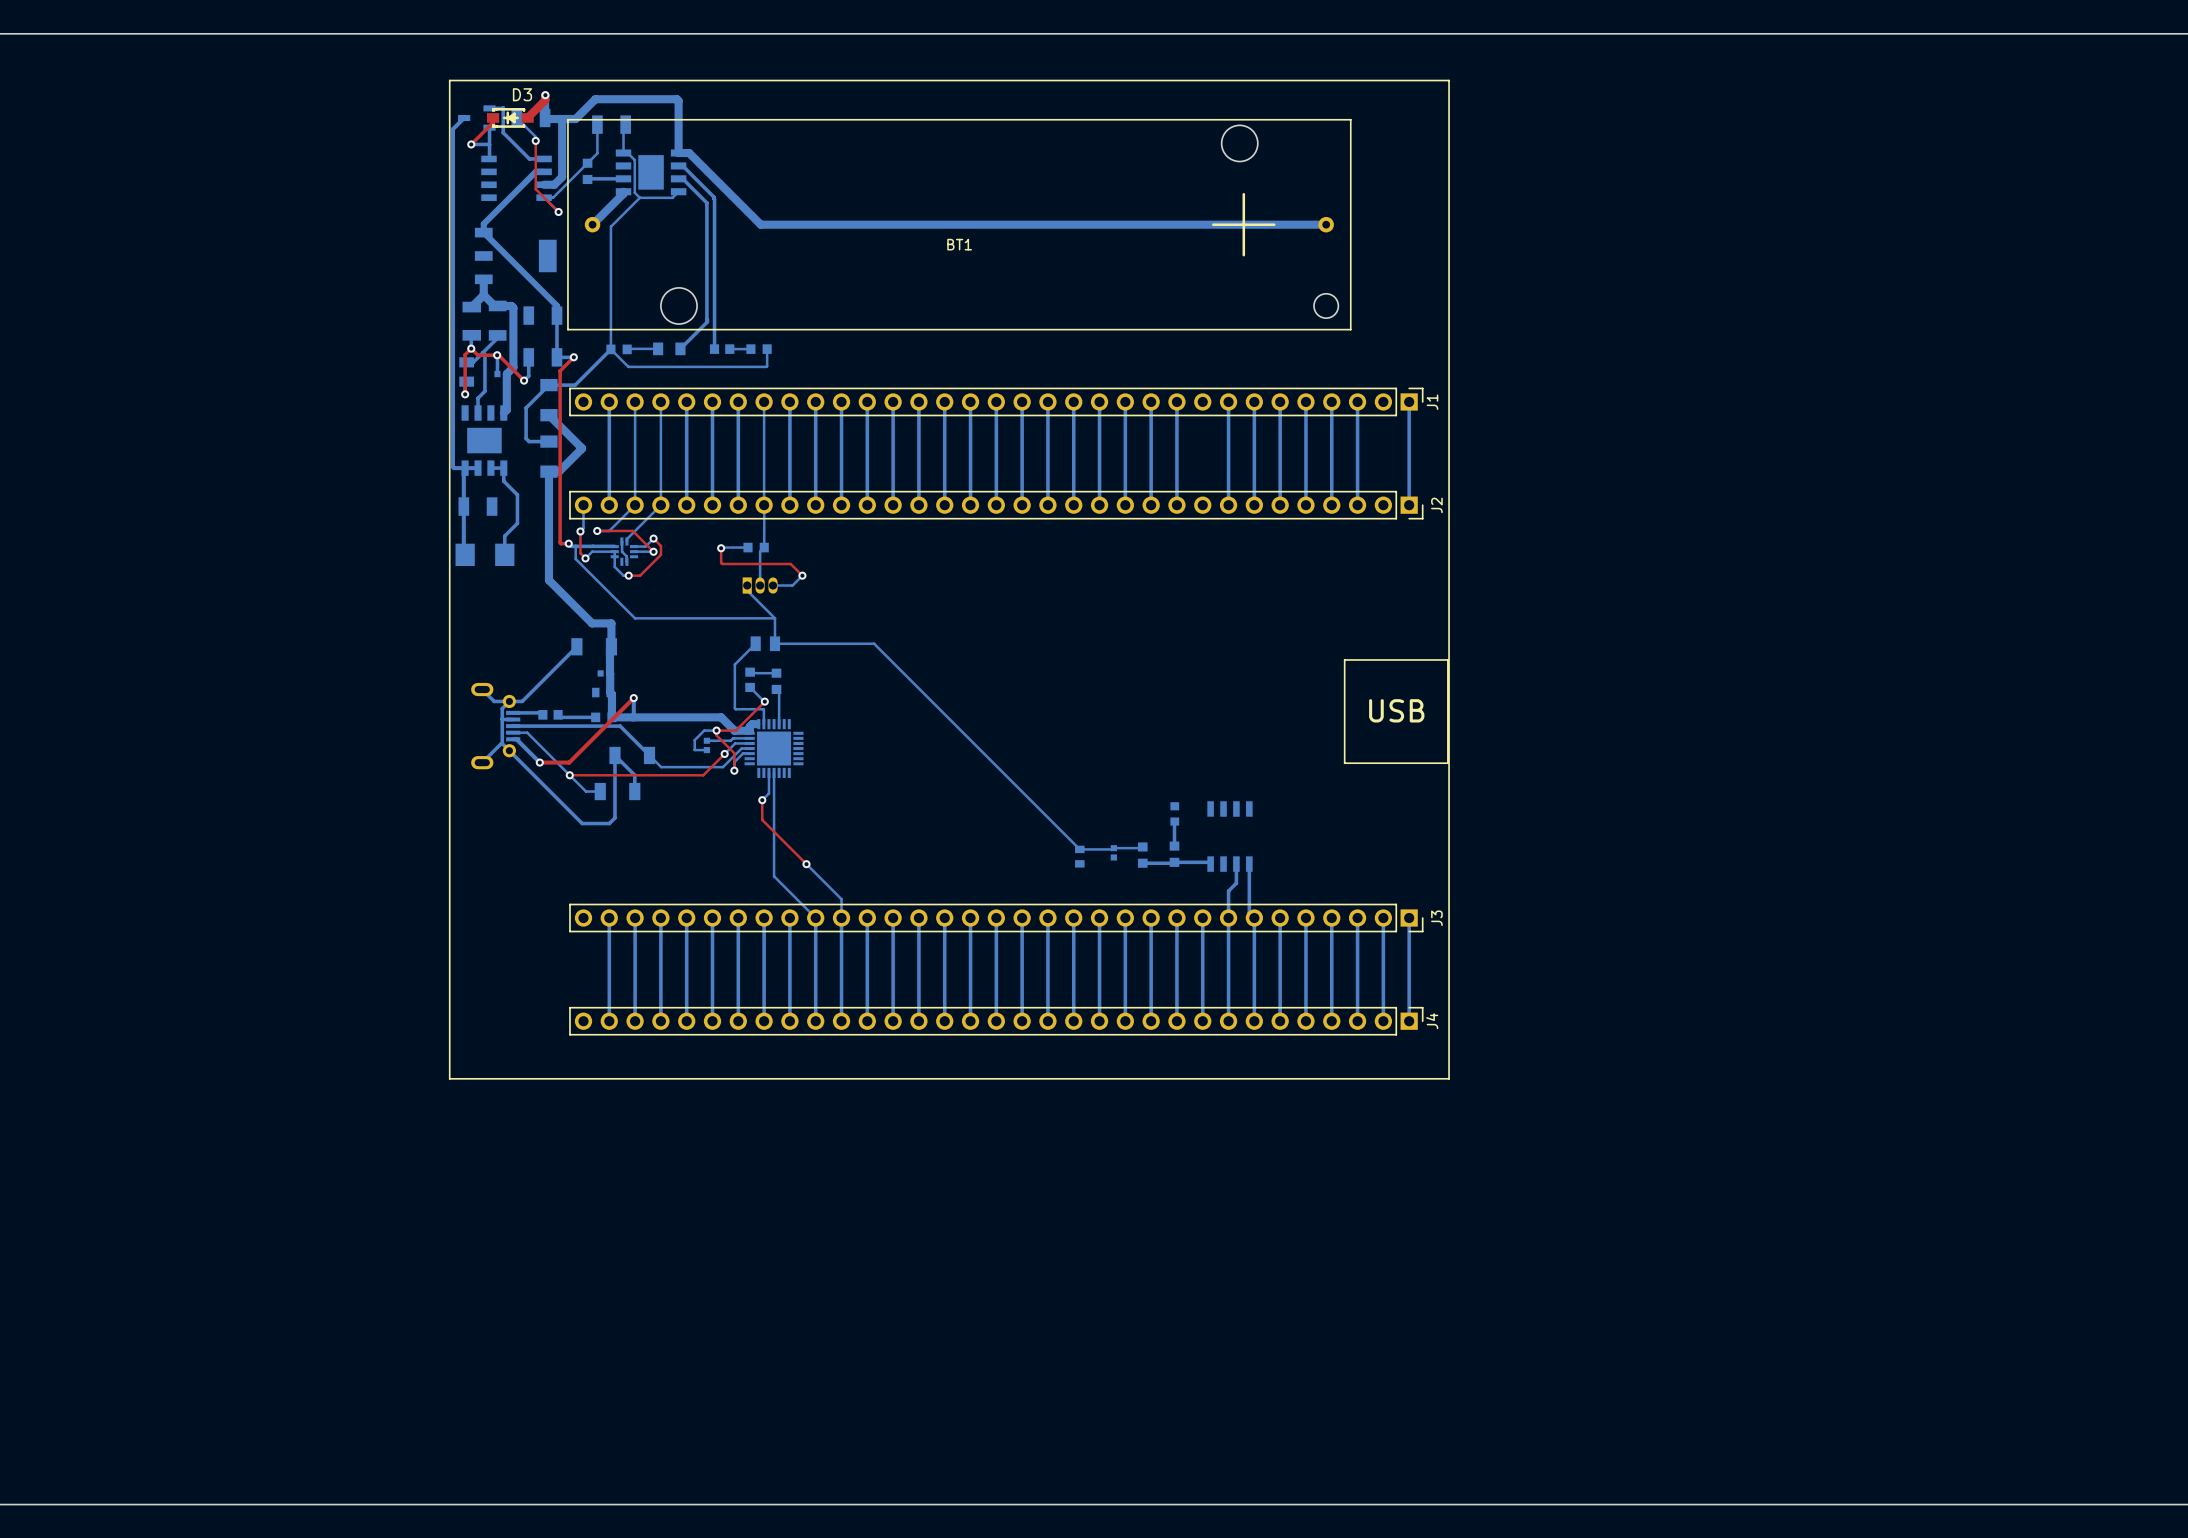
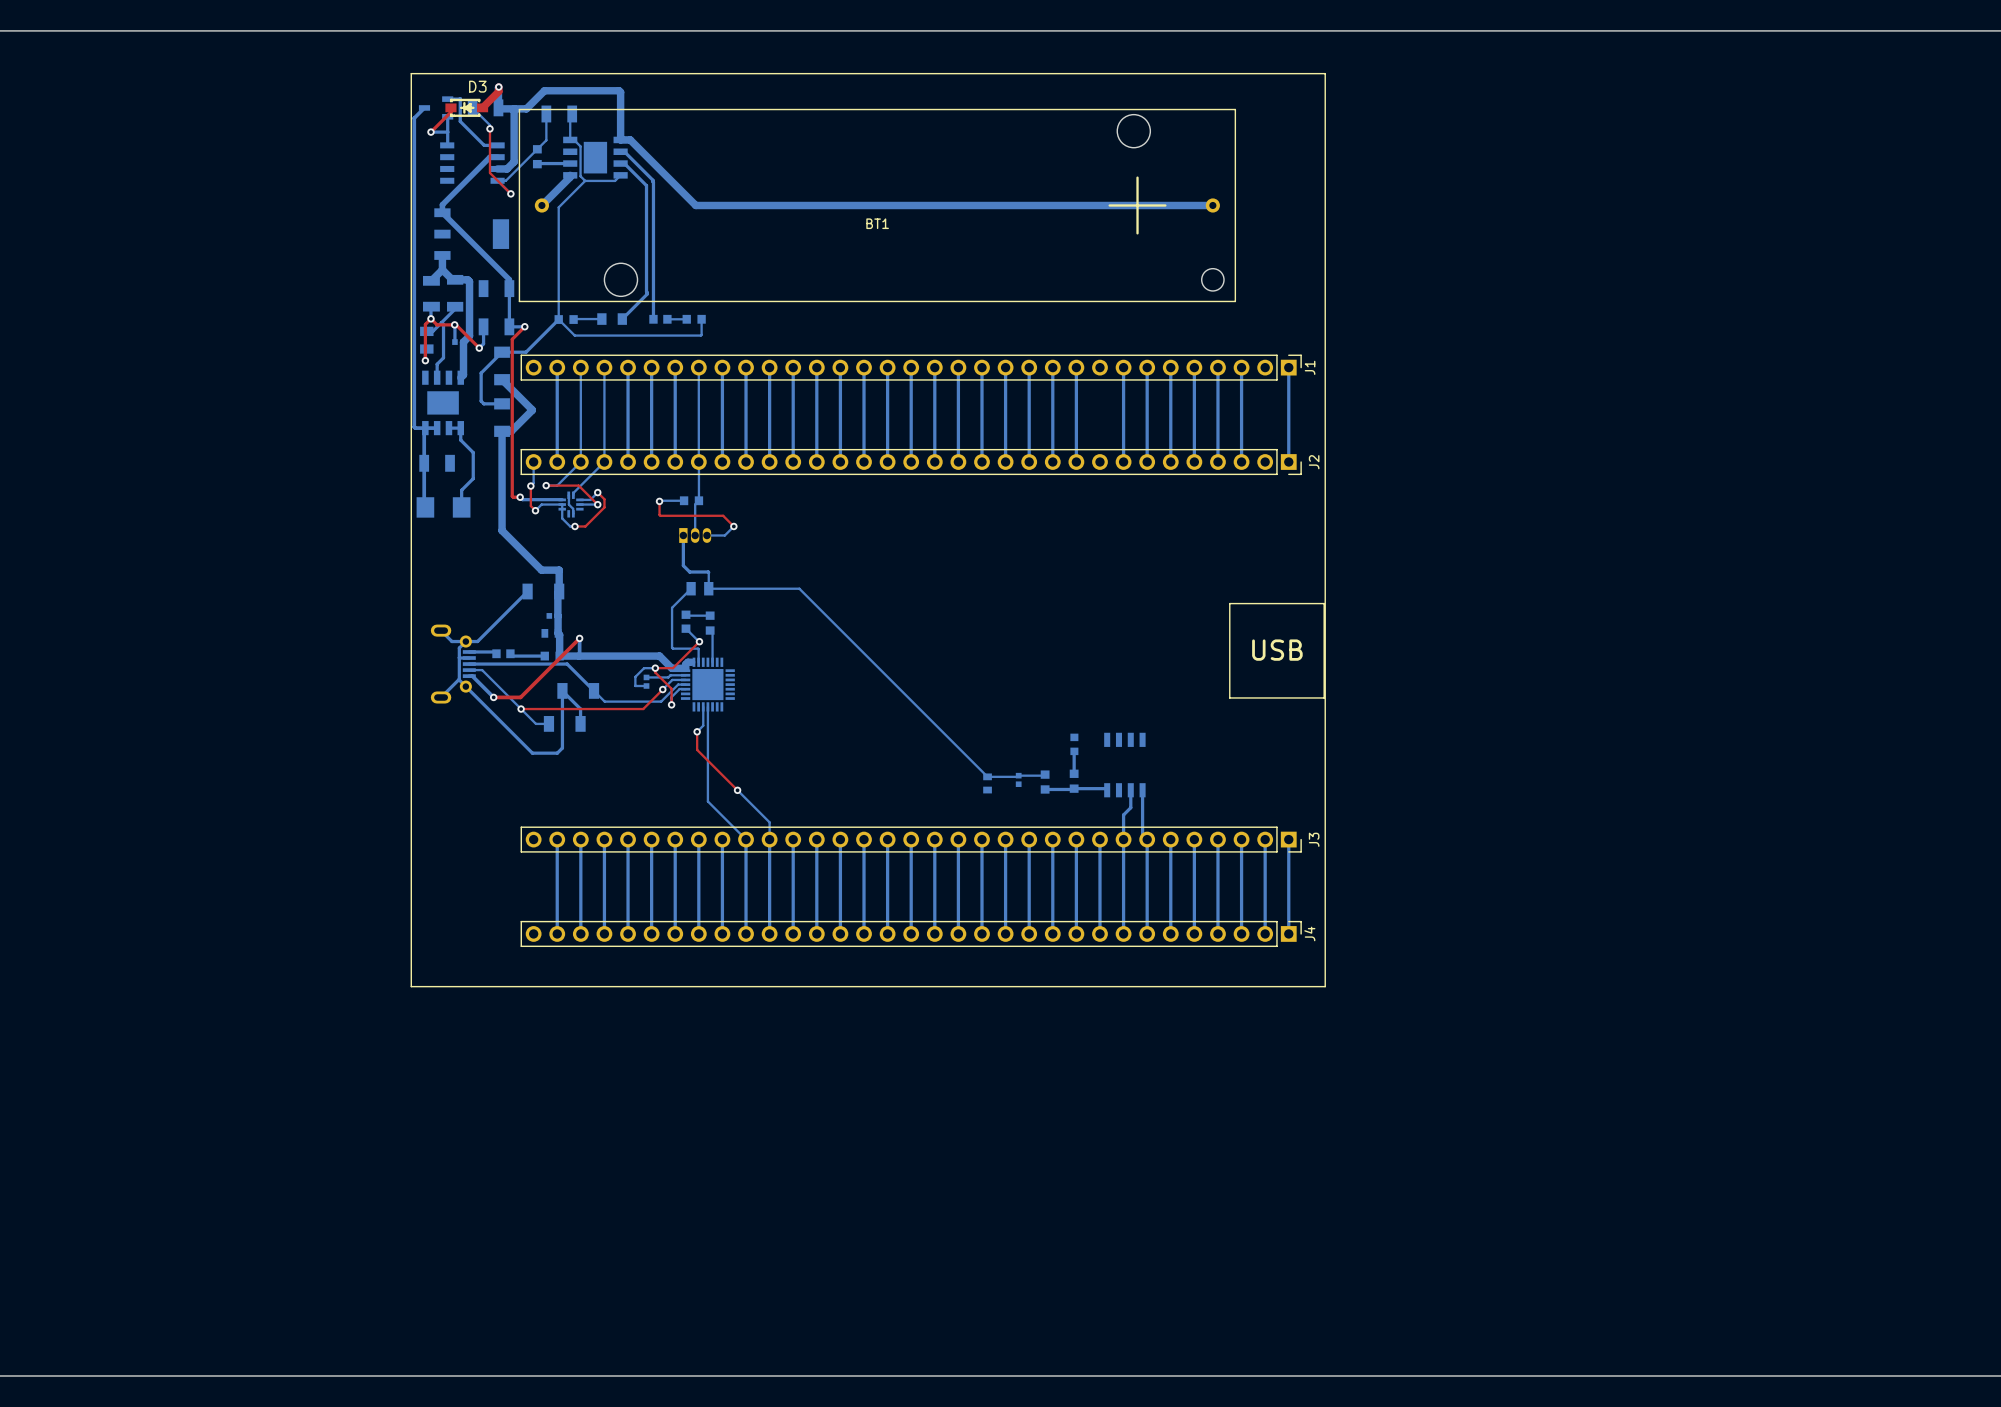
bottom track: (575, 546) (575, 559) (635, 618) (774, 618) -> none
bottom track: (747, 590) (774, 618) -> none
bottom track: (774, 618) (774, 625) -> (683, 535) (683, 565) (689, 572) (708, 572)

